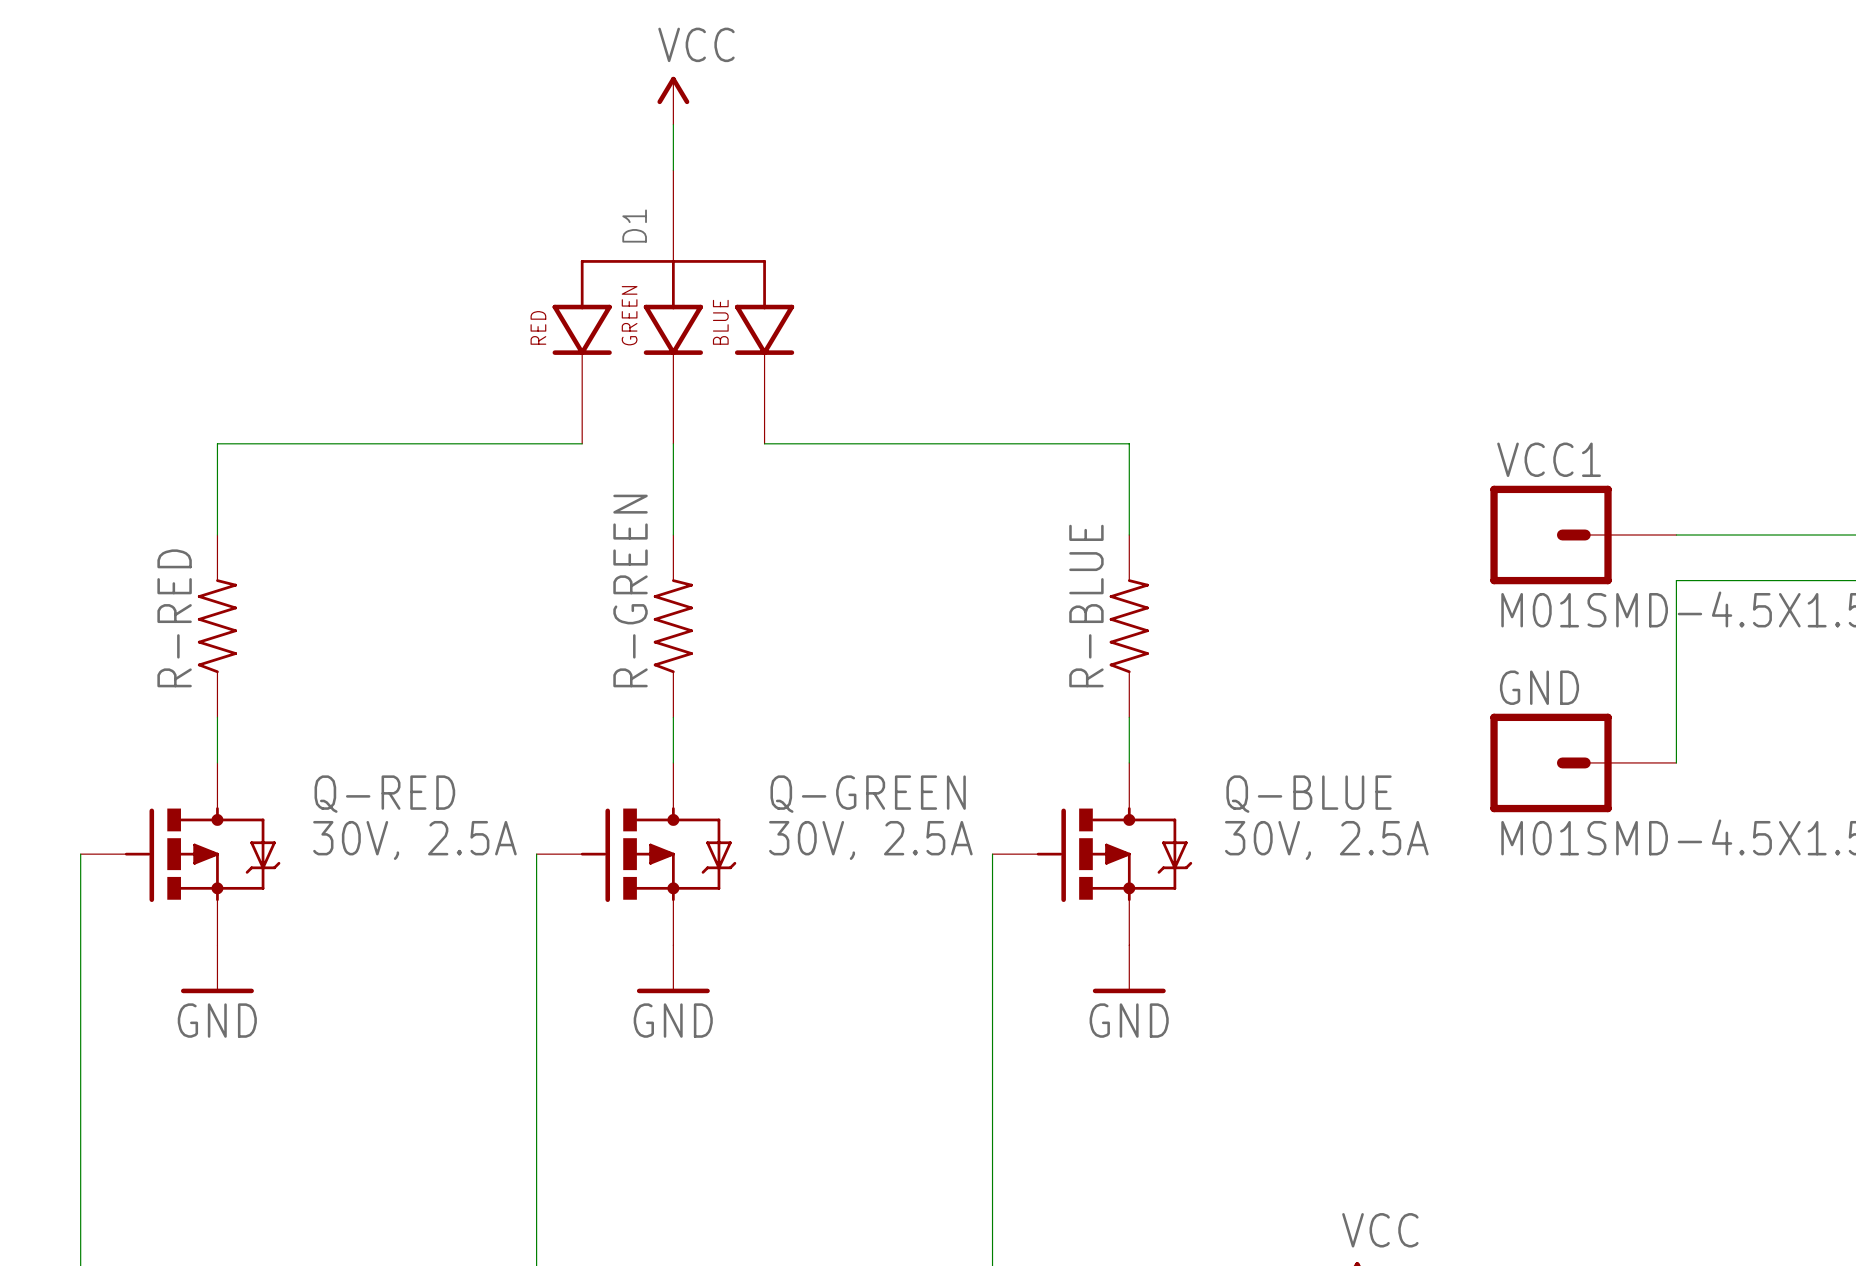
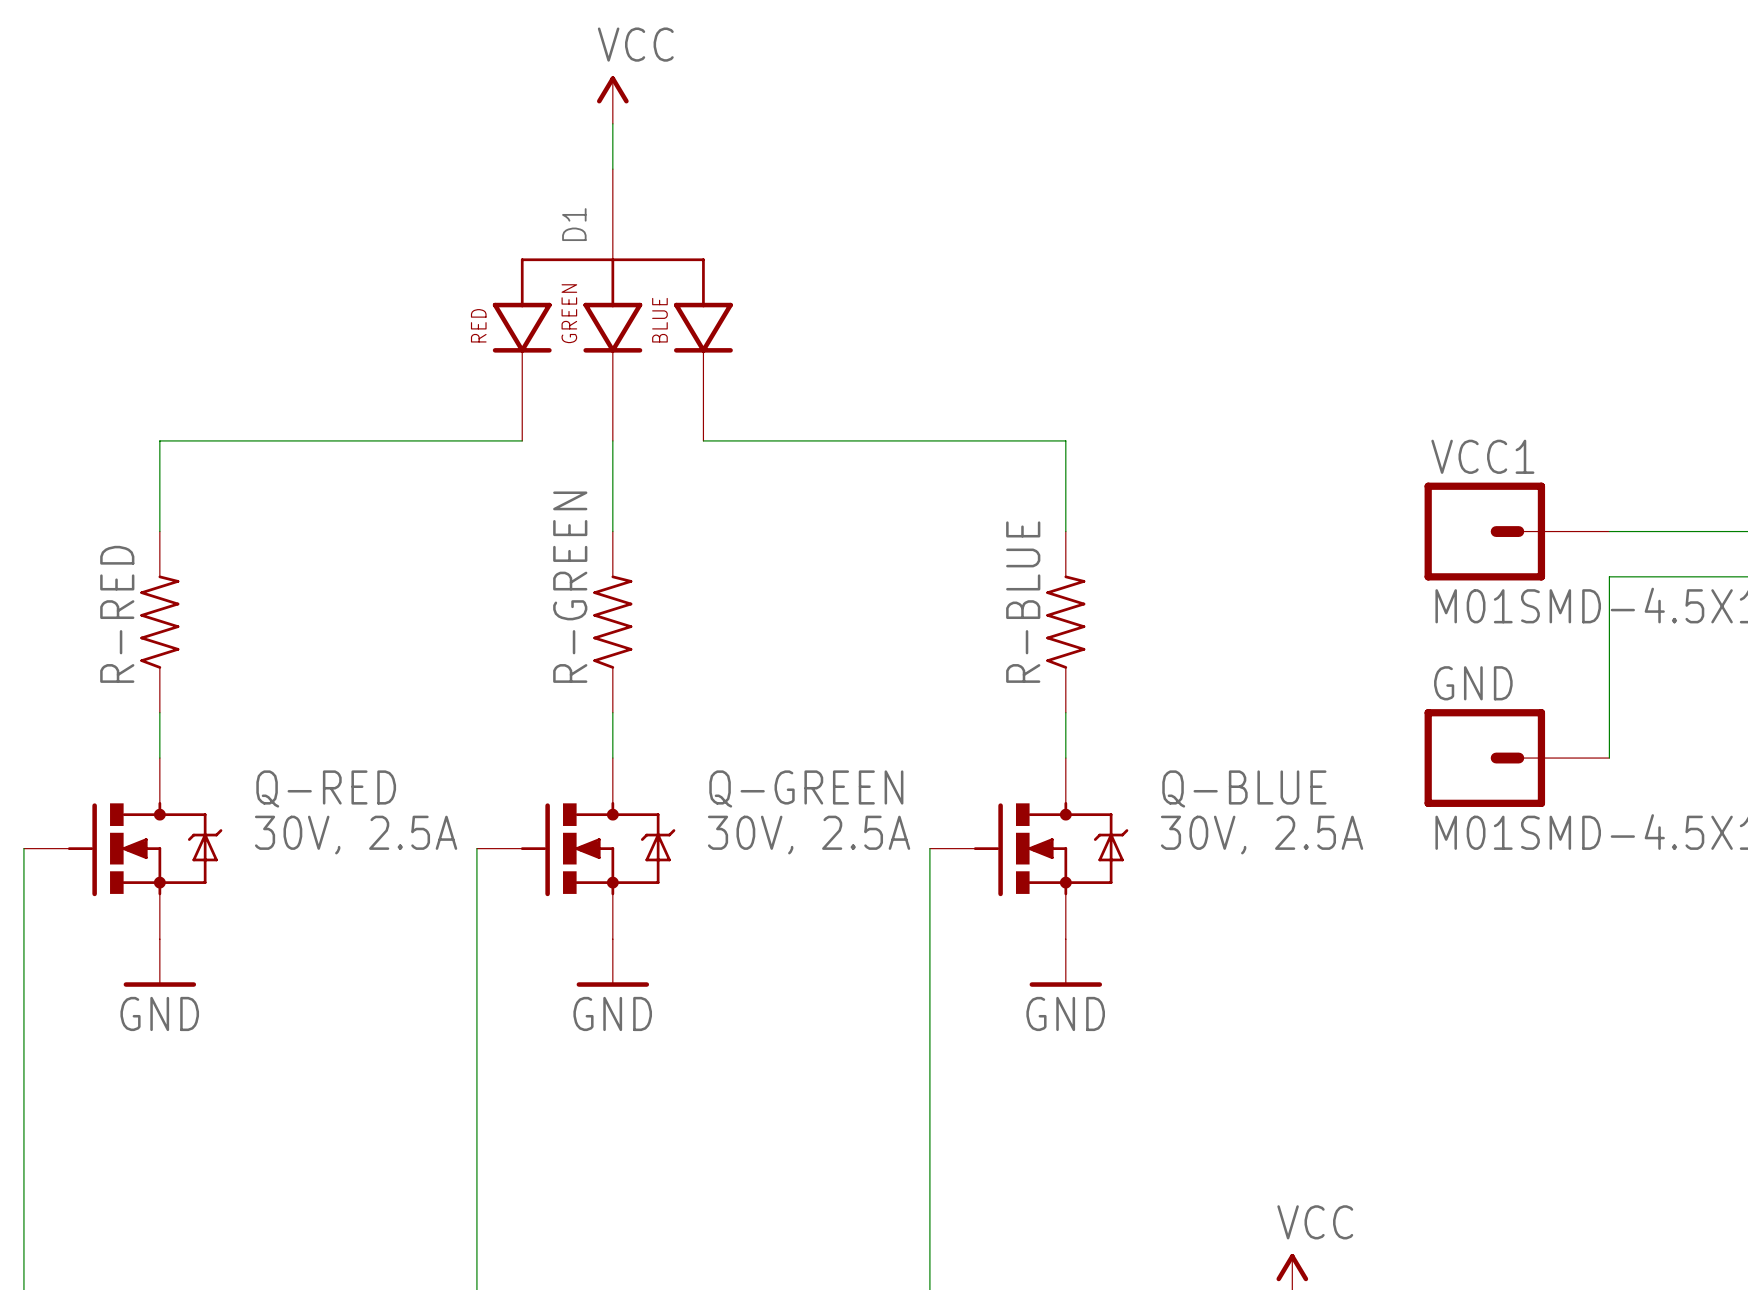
Q-RED symbol: [80, 762, 281, 946] -> [23, 758, 223, 940]
Q-GREEN symbol: [536, 762, 737, 946] -> [476, 758, 676, 940]
Q-BLUE symbol: [992, 762, 1193, 946] -> [929, 758, 1129, 940]

